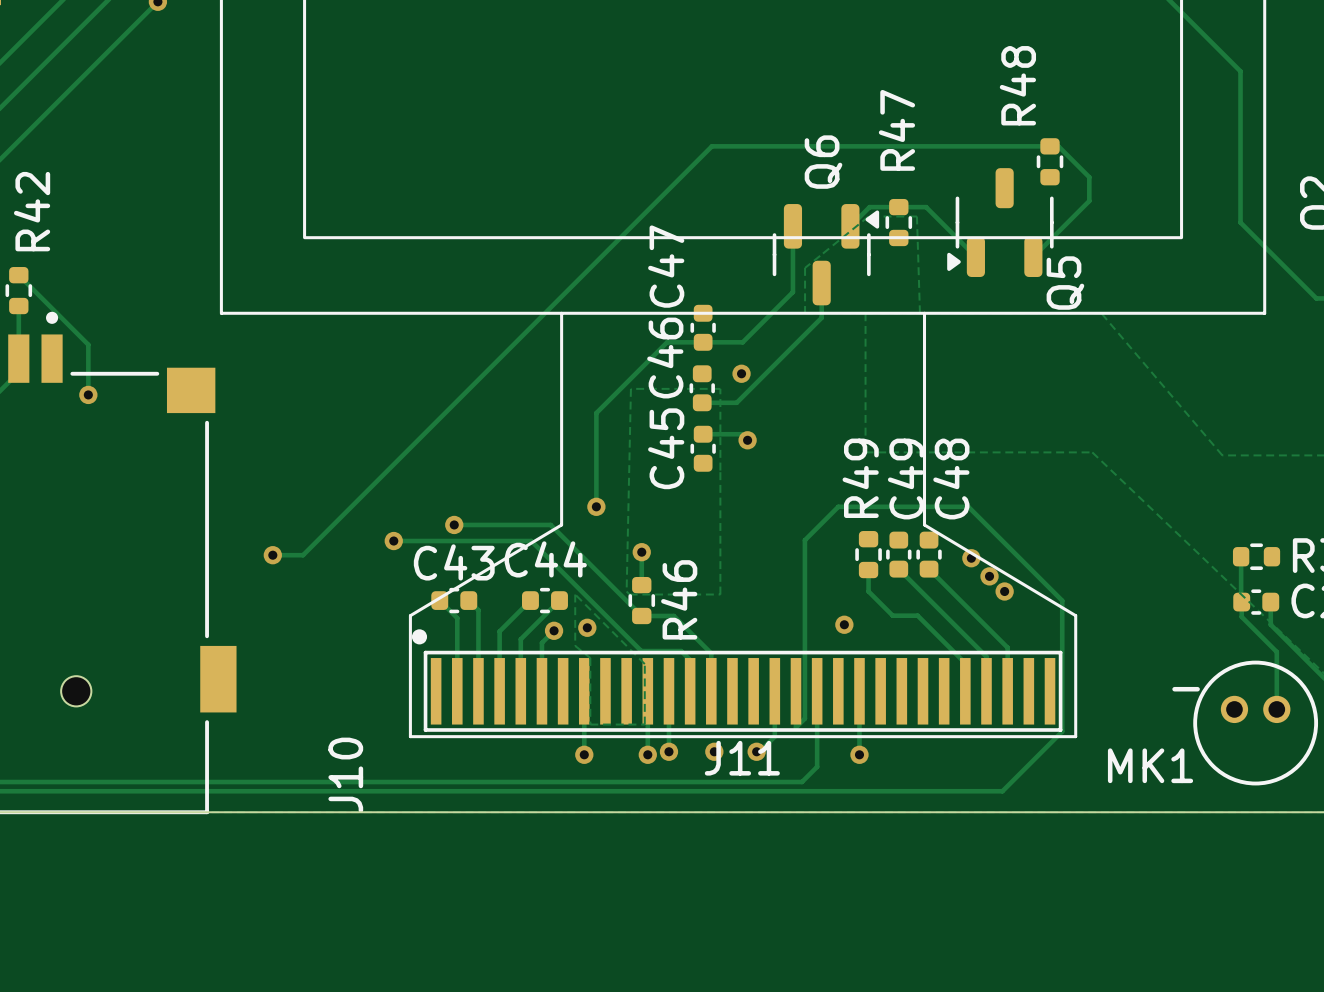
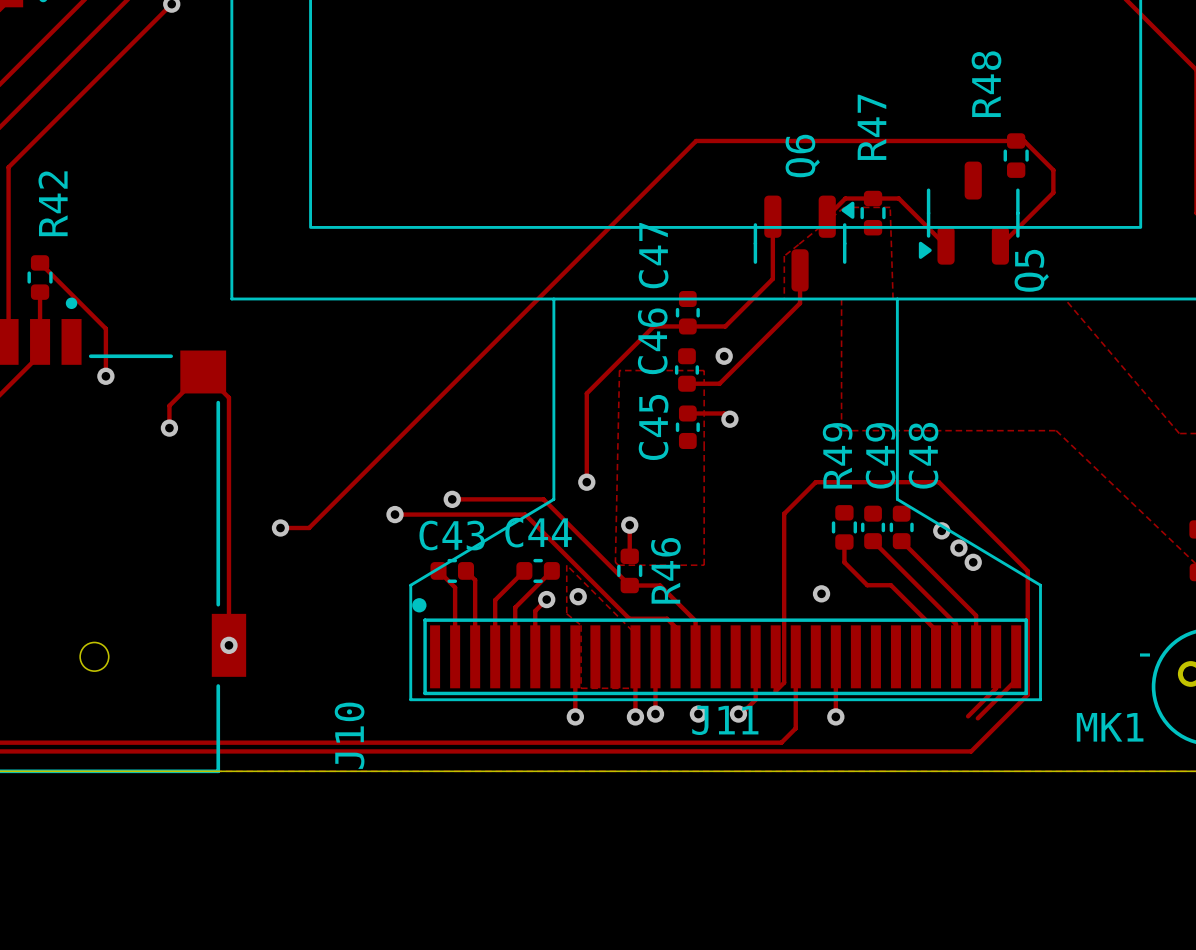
track: none -> (169, 428) (169, 405) (203, 371) (228, 397) (228, 645)
via: none -> (169, 428)
via: none -> (228, 645)
track: none -> (996, 656) (996, 688) (968, 716)
track: none -> (1016, 656) (1016, 679) (977, 718)

